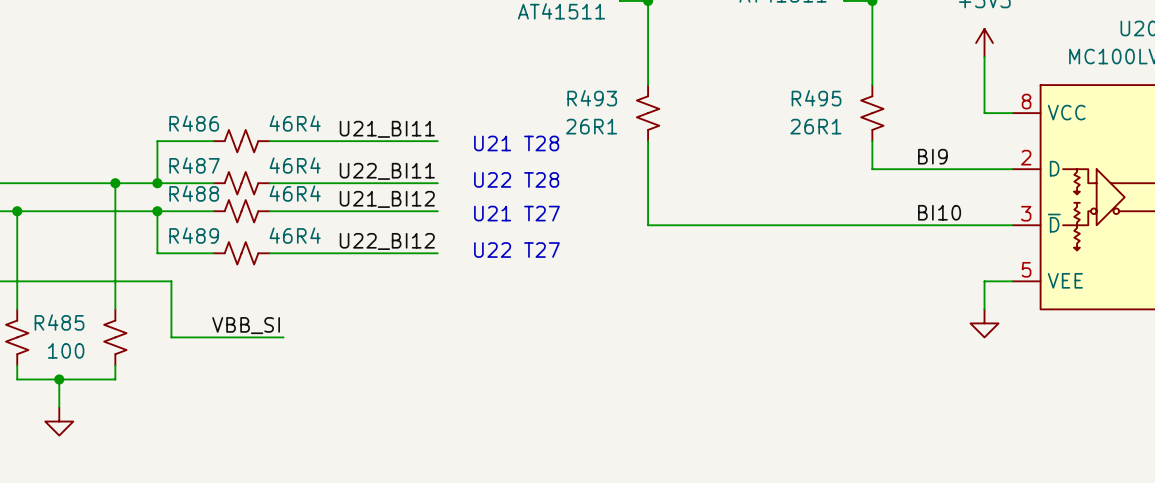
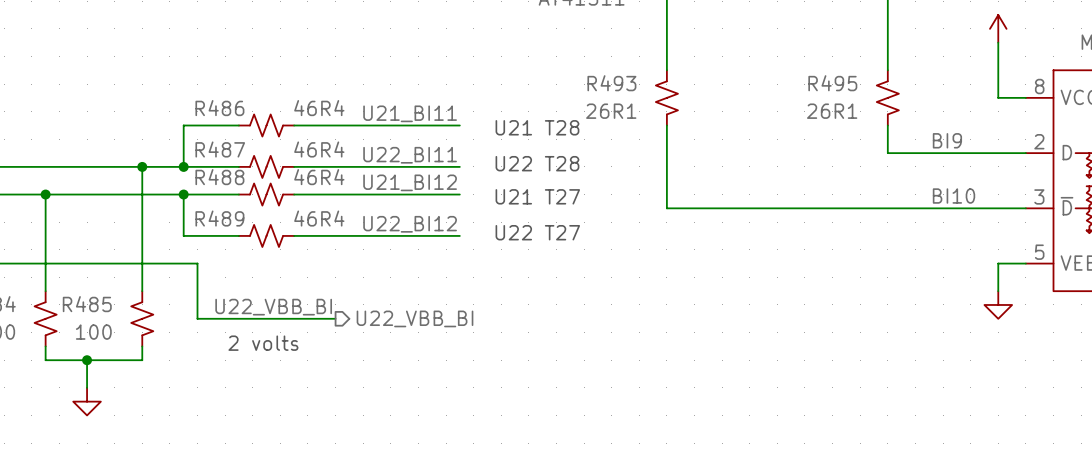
label: VBB_SI (246, 325) -> U22_VBB_BI (273, 307)
wire: none -> (307, 318) (335, 318)
hierarchical label: none -> U22_VBB_BI (415, 318)
text: none -> 2 volts (263, 343)

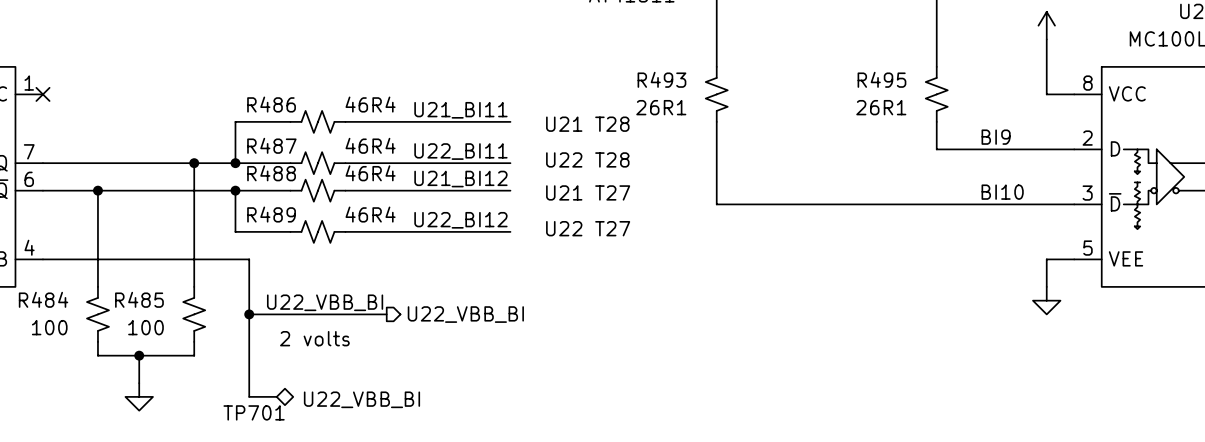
wire: none -> (249, 314) (249, 396)
junction: none -> (249, 314)
TP701: none -> U22_VBB_BI (271, 396)

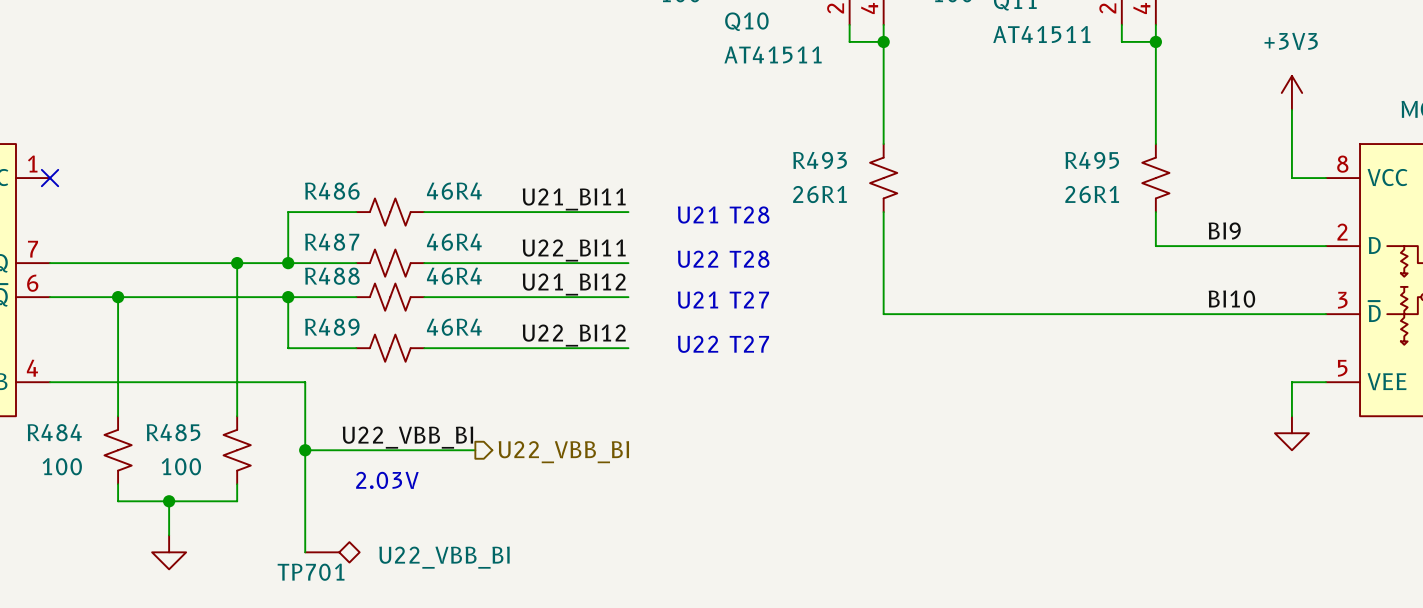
text: 2 volts (314, 338) -> 2.03V (387, 480)

